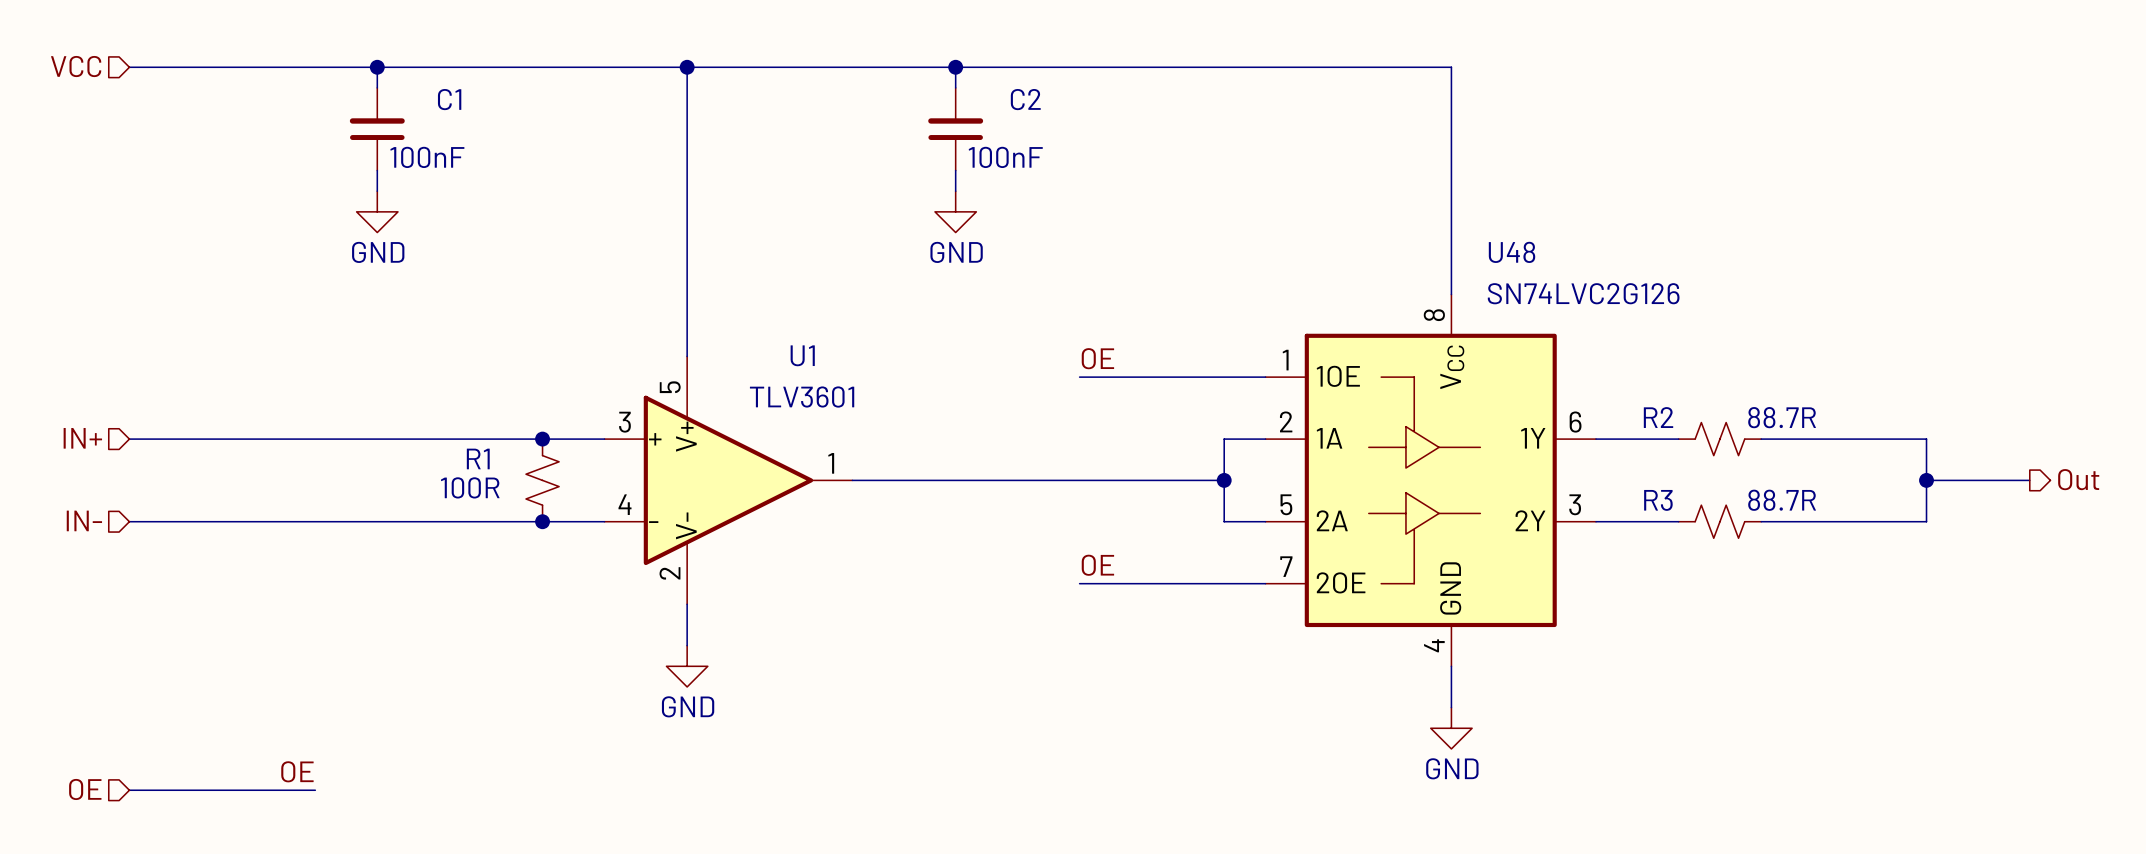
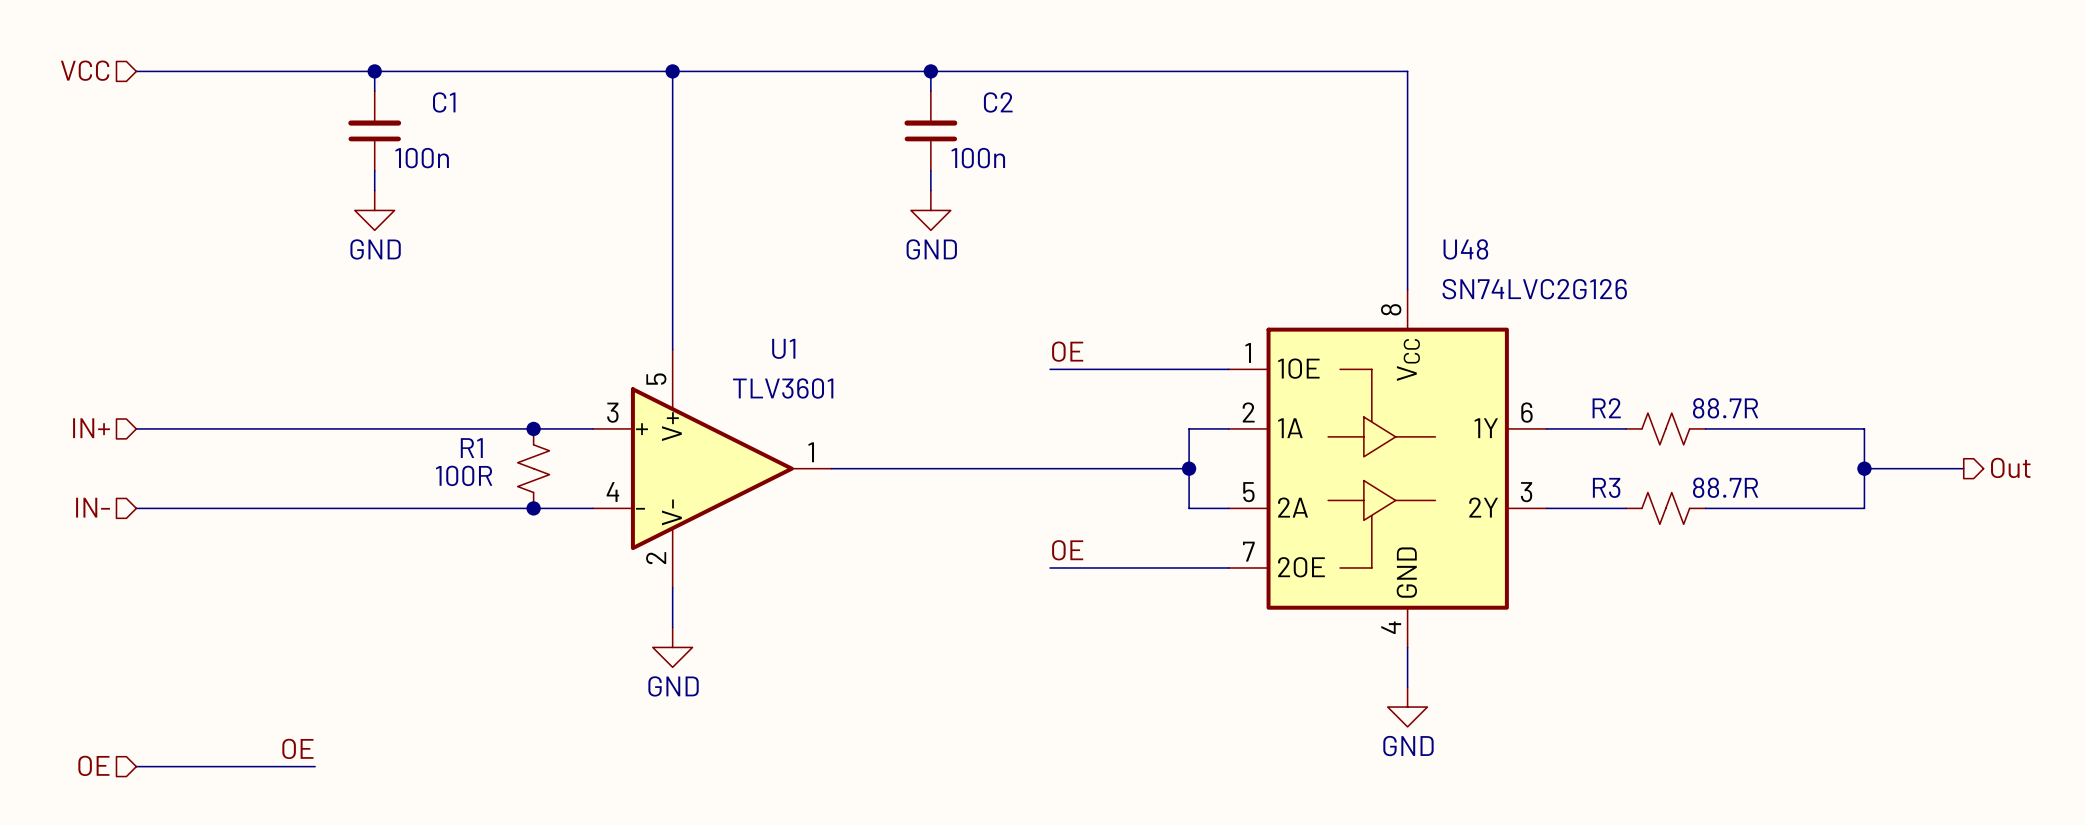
C1 value: 100nF (427, 157) -> 100n (422, 158)
C2 value: 100nF (1005, 157) -> 100n (978, 158)

